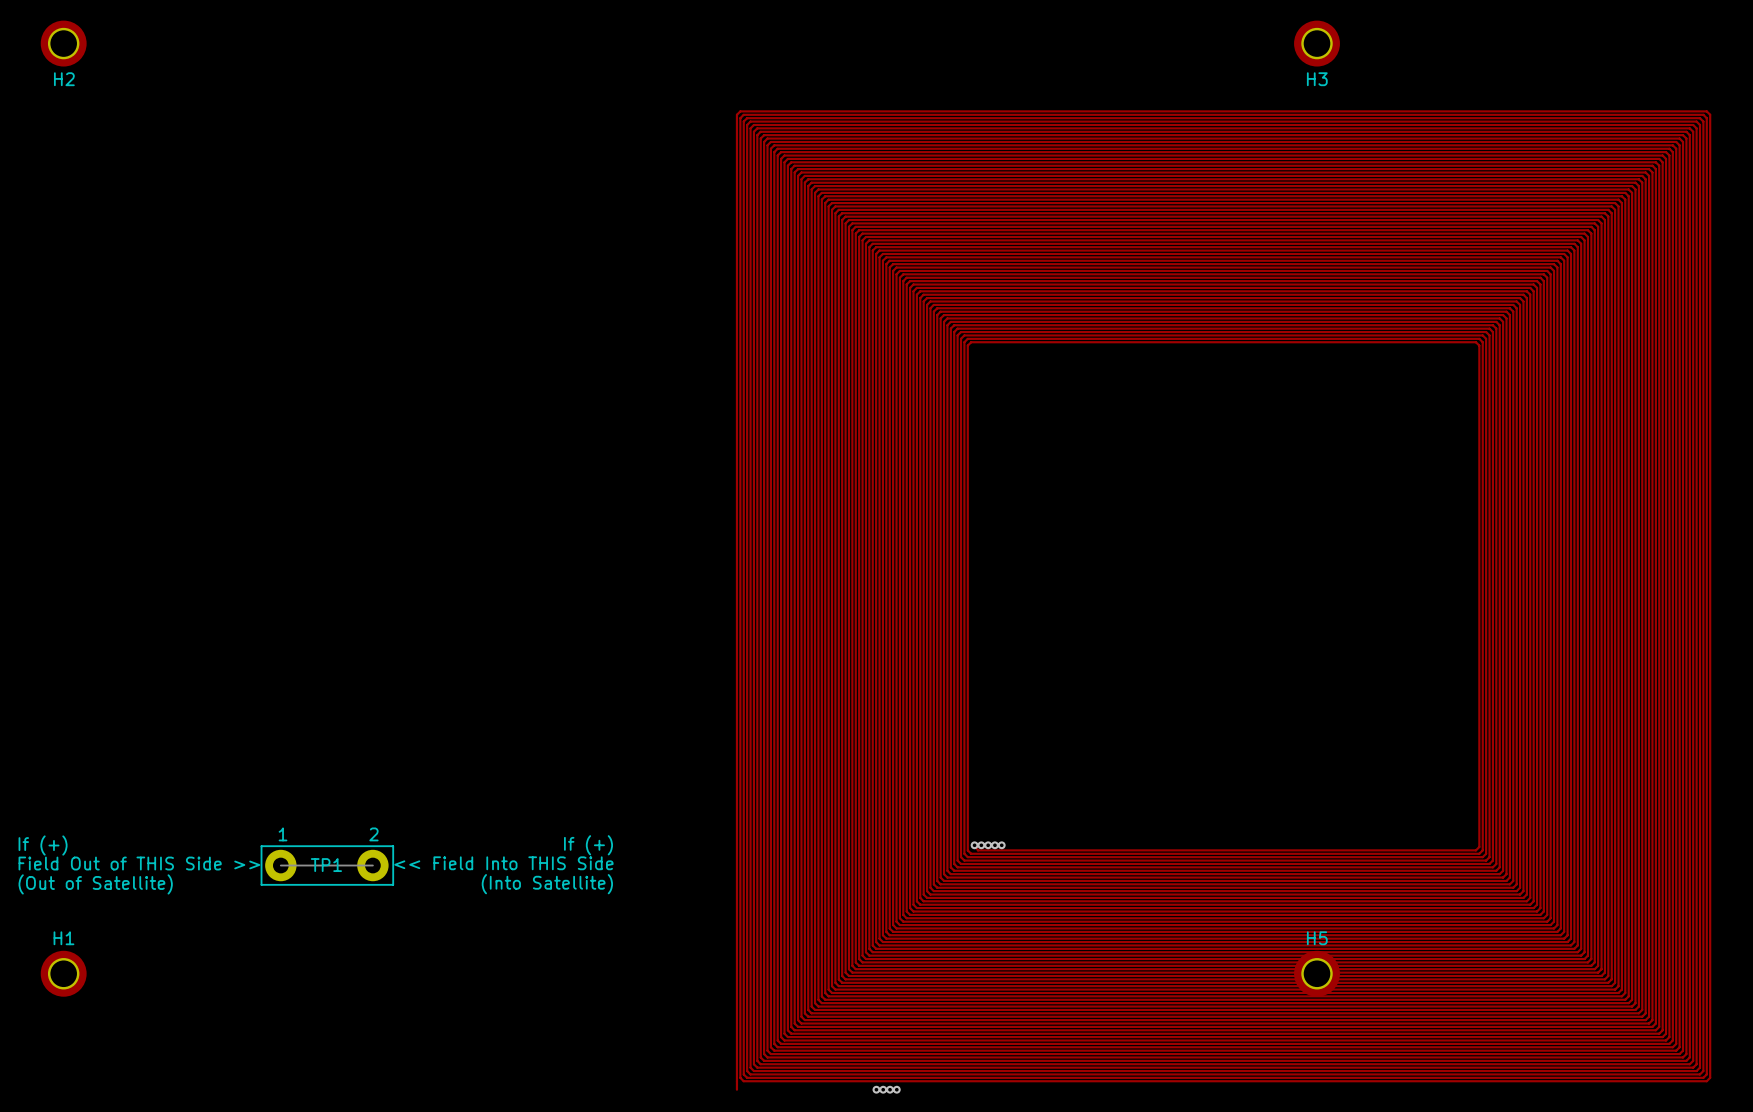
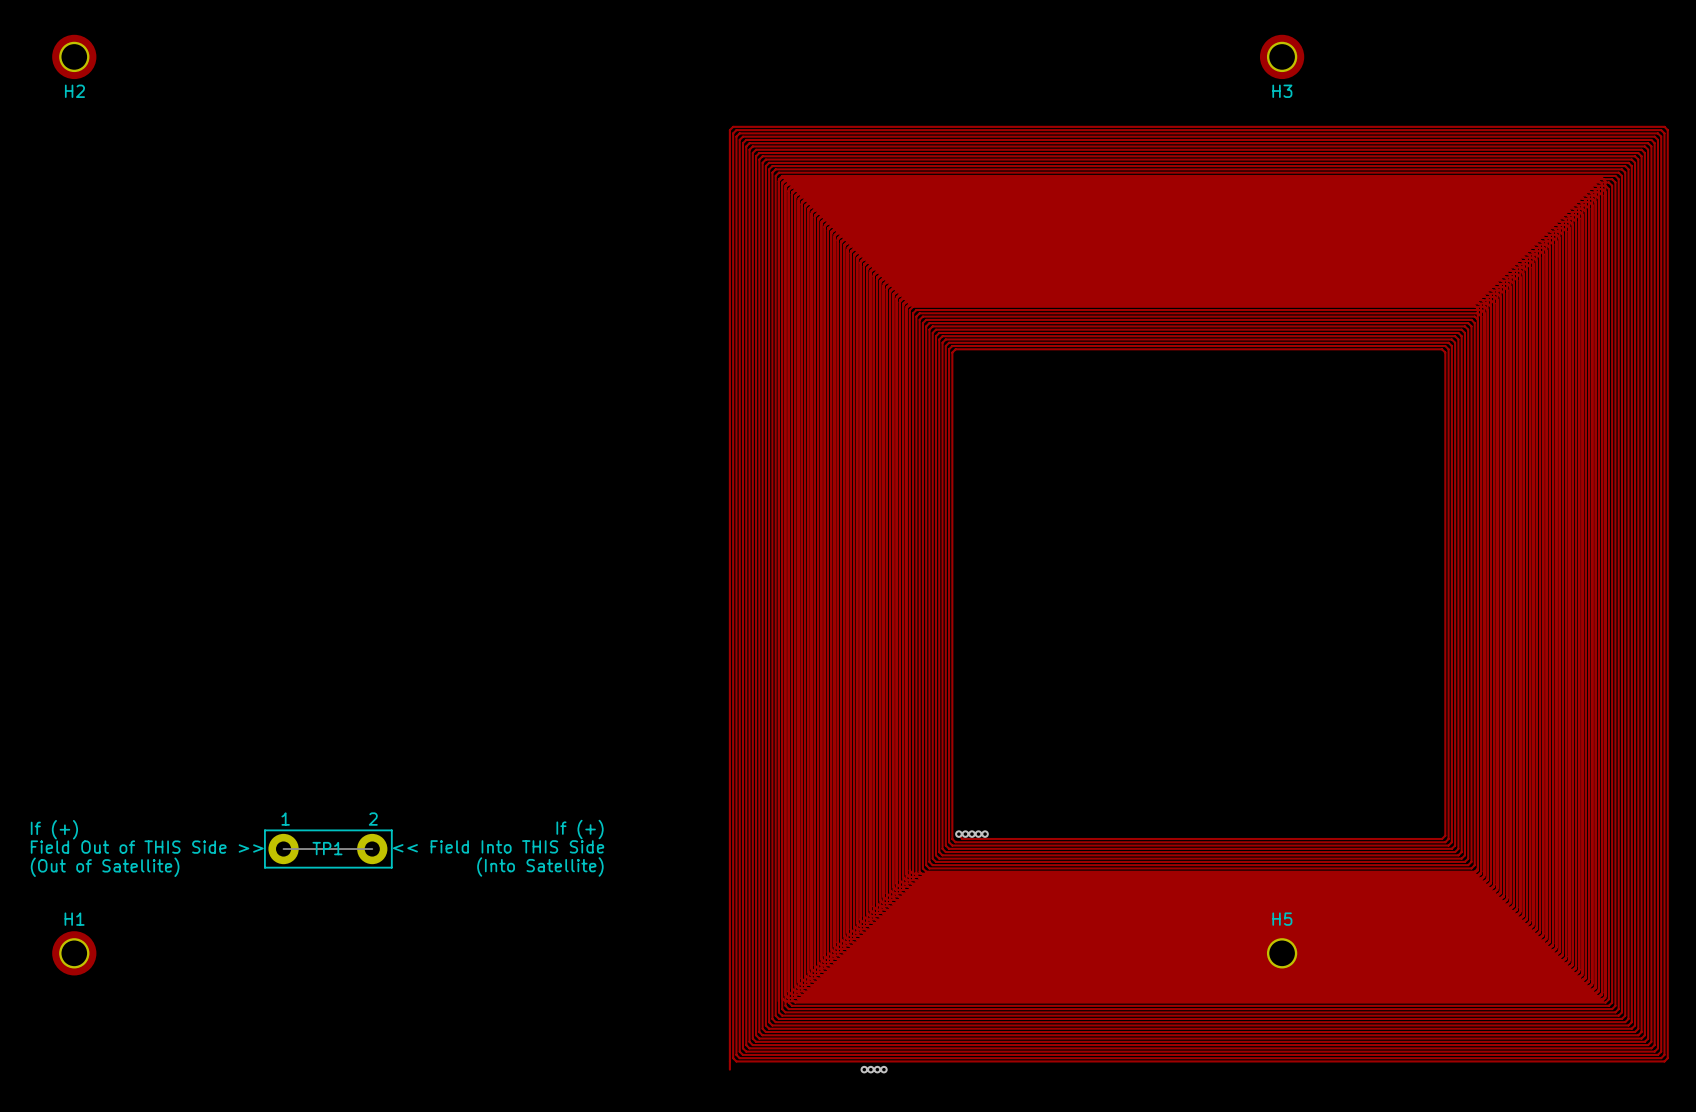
track: (974, 845) (977, 850) (1475, 850) (1479, 847) (1479, 345) (1475, 342) (971, 342) (967, 345) (967, 850) (971, 853) (1479, 853) (1482, 850) (1482, 342) (1479, 338) (967, 338) (964, 342) (964, 853) (967, 857) (1482, 857) (1486, 853) (1486, 338) (1482, 335) (964, 335) (961, 338) (961, 857) (964, 860) (1486, 860) (1489, 857) (1489, 335) (1486, 332) (961, 332) (957, 335) (957, 860) (961, 863) (1489, 863) (1492, 860) (1492, 332) (1489, 328) (957, 328) (954, 332) (954, 863) (957, 867) (1492, 867) (1496, 863) (1496, 328) (1492, 325) (954, 325) (950, 328) (950, 867) (954, 870) (1496, 870) (1499, 867) (1499, 325) (1496, 321) (950, 321) (947, 325) (947, 870) (950, 874) (1499, 874) (1503, 870) (1503, 321) (1499, 318) (947, 318) (944, 321) (944, 874) (947, 877) (1503, 877) (1506, 874) (1506, 318) (1503, 315) (944, 315) (940, 318) (940, 877) (944, 880) (1506, 880) (1509, 877) (1509, 315) (1506, 311) (940, 311) (937, 315) (937, 880) (940, 884) (1509, 884) (1513, 880) (1513, 311) (1509, 308) (937, 308) (933, 311) (933, 884) (937, 887) (1513, 887) (1516, 884) (1516, 308) (1513, 304) (933, 304) (930, 308) (930, 887) -> none
via: (974, 845) -> none
via: (981, 845) -> none
via: (988, 845) -> none
via: (994, 845) -> none
via: (1001, 845) -> none
track: none -> (958, 834) (962, 839) (1442, 839) (1445, 835) (1445, 352) (1442, 349) (955, 349) (952, 352) (952, 839) (955, 842) (1445, 842) (1448, 839) (1448, 349) (1445, 346) (952, 346) (949, 349) (949, 842) (952, 845) (1448, 845) (1451, 842) (1451, 346) (1448, 342) (949, 342) (945, 346) (945, 845) (949, 848) (1451, 848) (1455, 845) (1455, 342) (1451, 339) (945, 339) (942, 342) (942, 848) (945, 852) (1455, 852) (1458, 848) (1458, 339) (1455, 336) (942, 336) (939, 339) (939, 852) (942, 855) (1458, 855) (1461, 852) (1461, 336) (1458, 332) (939, 332) (935, 336) (935, 855) (939, 858) (1461, 858) (1464, 855) (1464, 332) (1461, 329) (935, 329) (932, 332) (932, 858) (935, 861) (1464, 861) (1468, 858) (1468, 329) (1464, 326) (932, 326) (929, 329) (929, 861) (932, 865) (1468, 865) (1471, 861) (1471, 326) (1468, 323) (929, 323) (926, 326) (926, 865) (929, 868) (1471, 868) (1474, 865) (1474, 323) (1471, 319) (926, 319) (922, 323) (922, 868) (926, 871) (1474, 871) (1478, 868) (1478, 319) (1474, 316) (922, 316) (919, 319) (919, 871) (922, 874) (1478, 874) (1481, 871) (1481, 316) (1478, 313) (919, 313) (916, 316) (916, 874) (919, 878) (1481, 878) (1484, 874) (1484, 313) (1481, 310) (916, 310) (913, 313) (913, 878) (916, 881) (1484, 881) (1487, 878) (1487, 310) (1484, 306) (913, 306) (909, 310) (909, 881) (913, 884) (1487, 884) (1491, 881) (1491, 306) (1487, 303) (909, 303) (906, 306) (906, 884) (909, 888) (1491, 888) (1494, 884) (1494, 303) (1491, 300) (906, 300) (903, 303) (903, 888) (906, 891) (1494, 891) (1497, 888) (1497, 300) (1494, 296) (903, 296) (900, 300) (900, 891) (903, 894) (1497, 894) (1500, 891) (1500, 296) (1497, 293) (900, 293) (896, 296) (896, 894) (900, 897) (1500, 897) (1504, 894) (1504, 293) (1500, 290) (896, 290) (893, 293) (893, 897) (896, 901) (1504, 901) (1507, 897) (1507, 290) (1504, 287) (893, 287) (890, 290) (890, 901) (893, 904) (1507, 904) (1510, 901) (1510, 287) (1507, 283) (890, 283) (886, 287) (886, 904) (890, 907) (1510, 907) (1514, 904) (1514, 283) (1510, 280) (886, 280) (883, 283) (883, 907) (886, 910) (1514, 910) (1517, 907) (1517, 280) (1514, 277) (883, 277) (880, 280) (880, 910) (883, 914) (1517, 914) (1520, 910) (1520, 277) (1517, 274) (880, 274) (877, 277) (877, 914) (880, 917) (1520, 917) (1523, 914) (1523, 274) (1520, 270) (877, 270) (873, 274) (873, 917) (877, 920) (1523, 920) (1527, 917) (1527, 270) (1523, 267) (873, 267) (870, 270) (870, 920) (873, 924) (1527, 924) (1530, 920) (1530, 267) (1527, 264) (870, 264) (867, 267) (867, 924) (870, 927) (1530, 927) (1533, 924) (1533, 264) (1530, 260) (867, 260) (864, 264) (864, 927) (867, 930) (1533, 930) (1536, 927) (1536, 260) (1533, 257) (864, 257) (860, 260) (860, 930) (864, 933) (1536, 933) (1540, 930) (1540, 257) (1536, 254) (860, 254) (857, 257) (857, 933) (860, 937) (1540, 937) (1543, 933) (1543, 254) (1540, 251) (857, 251) (854, 254) (854, 937) (857, 940) (1543, 940) (1546, 937) (1546, 251) (1543, 247) (854, 247) (850, 251) (850, 940) (854, 943) (1546, 943) (1549, 940) (1549, 247) (1546, 244) (850, 244) (847, 247) (847, 943) (850, 946) (1549, 946) (1553, 943) (1553, 244) (1549, 241) (847, 241) (844, 244) (844, 946) (847, 950) (1553, 950) (1556, 946) (1556, 241) (1553, 238) (844, 238) (841, 241) (841, 950) (844, 953) (1556, 953) (1559, 950) (1559, 238) (1556, 234) (841, 234) (837, 238) (837, 953) (841, 956) (1559, 956) (1563, 953) (1563, 234) (1559, 231) (837, 231) (834, 234) (834, 956) (837, 960) (1563, 960) (1566, 956) (1566, 231) (1563, 228) (834, 228) (831, 231) (831, 960) (834, 963) (1566, 963) (1569, 960) (1569, 228) (1566, 224) (831, 224) (828, 228) (828, 963) (831, 966) (1569, 966) (1572, 963) (1572, 224) (1569, 221) (828, 221) (824, 224) (824, 966) (828, 969) (1572, 969) (1576, 966) (1576, 221) (1572, 218) (824, 218) (821, 221) (821, 969) (824, 973) (1576, 973) (1579, 969) (1579, 218) (1576, 215) (821, 215) (818, 218) (818, 973) (821, 976) (1579, 976) (1582, 973) (1582, 215) (1579, 211) (818, 211) (814, 215) (814, 976) (818, 979) (1582, 979) (1585, 976) (1585, 211) (1582, 208) (814, 208) (811, 211) (811, 979) (814, 982) (1585, 982) (1589, 979) (1589, 208) (1585, 205) (811, 205) (808, 208) (808, 982) (811, 986) (1589, 986) (1592, 982) (1592, 205) (1589, 202) (808, 202) (805, 205) (805, 986) (808, 989) (1592, 989) (1595, 986) (1595, 202) (1592, 198) (805, 198) (801, 202) (801, 989) (805, 992) (1595, 992) (1599, 989) (1599, 198) (1595, 195) (801, 195) (798, 198) (798, 992) (801, 996) (1599, 996) (1602, 992) (1602, 195) (1599, 192) (798, 192) (795, 195) (795, 996) (798, 999) (1602, 999) (1605, 996) (1605, 192) (1602, 189) (795, 189) (792, 192) (792, 999) (795, 1002) (1605, 1002) (1608, 999) (1608, 189) (1605, 185) (792, 185) (788, 189) (788, 1002) (792, 1005) (1608, 1005) (1612, 1002) (1612, 185) (1608, 182) (788, 182) (785, 185) (785, 1005) (788, 1009) (1612, 1009) (1615, 1005) (1615, 182) (1612, 179) (785, 179) (782, 182) (782, 1009) (785, 1012) (1615, 1012) (1618, 1009) (1618, 179) (1615, 175) (782, 175) (778, 179) (778, 1012) (782, 1015) (1618, 1015) (1621, 1012) (1621, 175) (1618, 172) (778, 172) (775, 175) (775, 1015) (778, 1018) (1621, 1018) (1625, 1015) (1625, 172) (1621, 169) (775, 169) (772, 172) (772, 1018) (775, 1022) (1625, 1022) (1628, 1018) (1628, 169) (1625, 166) (772, 166) (769, 169) (769, 1022) (772, 1025) (1628, 1025) (1631, 1022) (1631, 166) (1628, 162) (769, 162) (765, 166) (765, 1025) (769, 1028) (1631, 1028) (1635, 1025) (1635, 162) (1631, 159) (765, 159) (762, 162) (762, 1028) (765, 1032) (1635, 1032) (1638, 1028) (1638, 159) (1635, 156) (762, 156) (759, 159) (759, 1032) (762, 1035) (1638, 1035) (1641, 1032) (1641, 156) (1638, 153) (759, 153) (756, 156) (756, 1035) (759, 1038) (1641, 1038) (1644, 1035) (1644, 153) (1641, 149) (756, 149) (752, 153) (752, 1038) (756, 1041) (1644, 1041) (1648, 1038) (1648, 149) (1644, 146) (752, 146) (749, 149) (749, 1041) (752, 1045) (1648, 1045) (1651, 1041) (1651, 146) (1648, 143) (749, 143) (746, 146) (746, 1045) (749, 1048) (1651, 1048) (1654, 1045) (1654, 143) (1651, 139) (746, 139) (742, 143) (742, 1048) (746, 1051) (1654, 1051) (1657, 1048) (1657, 139) (1654, 136) (742, 136) (739, 139) (739, 1051) (742, 1054) (1657, 1054) (1661, 1051) (1661, 136) (1657, 133) (739, 133) (736, 136) (736, 1054) (739, 1058) (1661, 1058) (1664, 1054) (1664, 133) (1661, 130) (736, 130) (733, 133) (733, 1058) (736, 1061) (1664, 1061) (1667, 1058) (1667, 130) (1664, 126) (733, 126) (729, 130) (729, 1069)
via: none -> (958, 834)
via: none -> (965, 834)
via: none -> (971, 834)
via: none -> (978, 834)
via: none -> (985, 834)
track: (794, 1023) (798, 1026) (1652, 1026) (1655, 1023) (1655, 169) (1652, 165) (794, 165) (791, 169) (791, 1026) (794, 1030) (1655, 1030) (1659, 1026) (1659, 165) (1655, 162) (791, 162) (787, 165) (787, 1030) (791, 1033) (1659, 1033) (1662, 1030) (1662, 162) (1659, 158) (787, 158) (784, 162) (784, 1033) (787, 1037) (1662, 1037) (1666, 1033) (1666, 158) (1662, 155) (784, 155) (781, 158) (781, 1037) (784, 1040) (1666, 1040) (1669, 1037) (1669, 155) (1666, 152) (781, 152) (777, 155) (777, 1040) (781, 1043) (1669, 1043) (1672, 1040) (1672, 152) (1669, 148) (777, 148) (774, 152) (774, 1043) (777, 1047) (1672, 1047) (1676, 1043) (1676, 148) (1672, 145) (774, 145) (770, 148) (770, 1047) (774, 1050) (1676, 1050) (1679, 1047) (1679, 145) (1676, 141) (770, 141) (767, 145) (767, 1050) (770, 1054) (1679, 1054) (1683, 1050) (1683, 141) (1679, 138) (767, 138) (764, 141) (764, 1054) (767, 1057) (1683, 1057) (1686, 1054) (1686, 138) (1683, 135) (764, 135) (760, 138) (760, 1057) (764, 1060) (1686, 1060) (1689, 1057) (1689, 135) (1686, 131) (760, 131) (757, 135) (757, 1060) (760, 1064) (1689, 1064) (1693, 1060) (1693, 131) (1689, 128) (757, 128) (753, 131) (753, 1064) (757, 1067) (1693, 1067) (1696, 1064) (1696, 128) (1693, 124) (753, 124) (750, 128) (750, 1067) (753, 1071) (1696, 1071) (1699, 1067) (1699, 124) (1696, 121) (750, 121) (747, 124) (747, 1071) (750, 1074) (1699, 1074) (1703, 1071) (1703, 121) (1699, 118) (747, 118) (743, 121) (743, 1074) (747, 1077) (1703, 1077) (1706, 1074) (1706, 118) (1703, 114) (743, 114) (740, 118) (740, 1077) (743, 1081) (1706, 1081) (1710, 1077) (1710, 114) (1706, 111) (740, 111) (736, 114) (736, 1089) -> none
via: (876, 1089) -> none
via: (883, 1089) -> none
via: (890, 1089) -> none
via: (896, 1089) -> none
via: none -> (864, 1069)
via: none -> (870, 1069)
via: none -> (877, 1069)
via: none -> (883, 1069)

